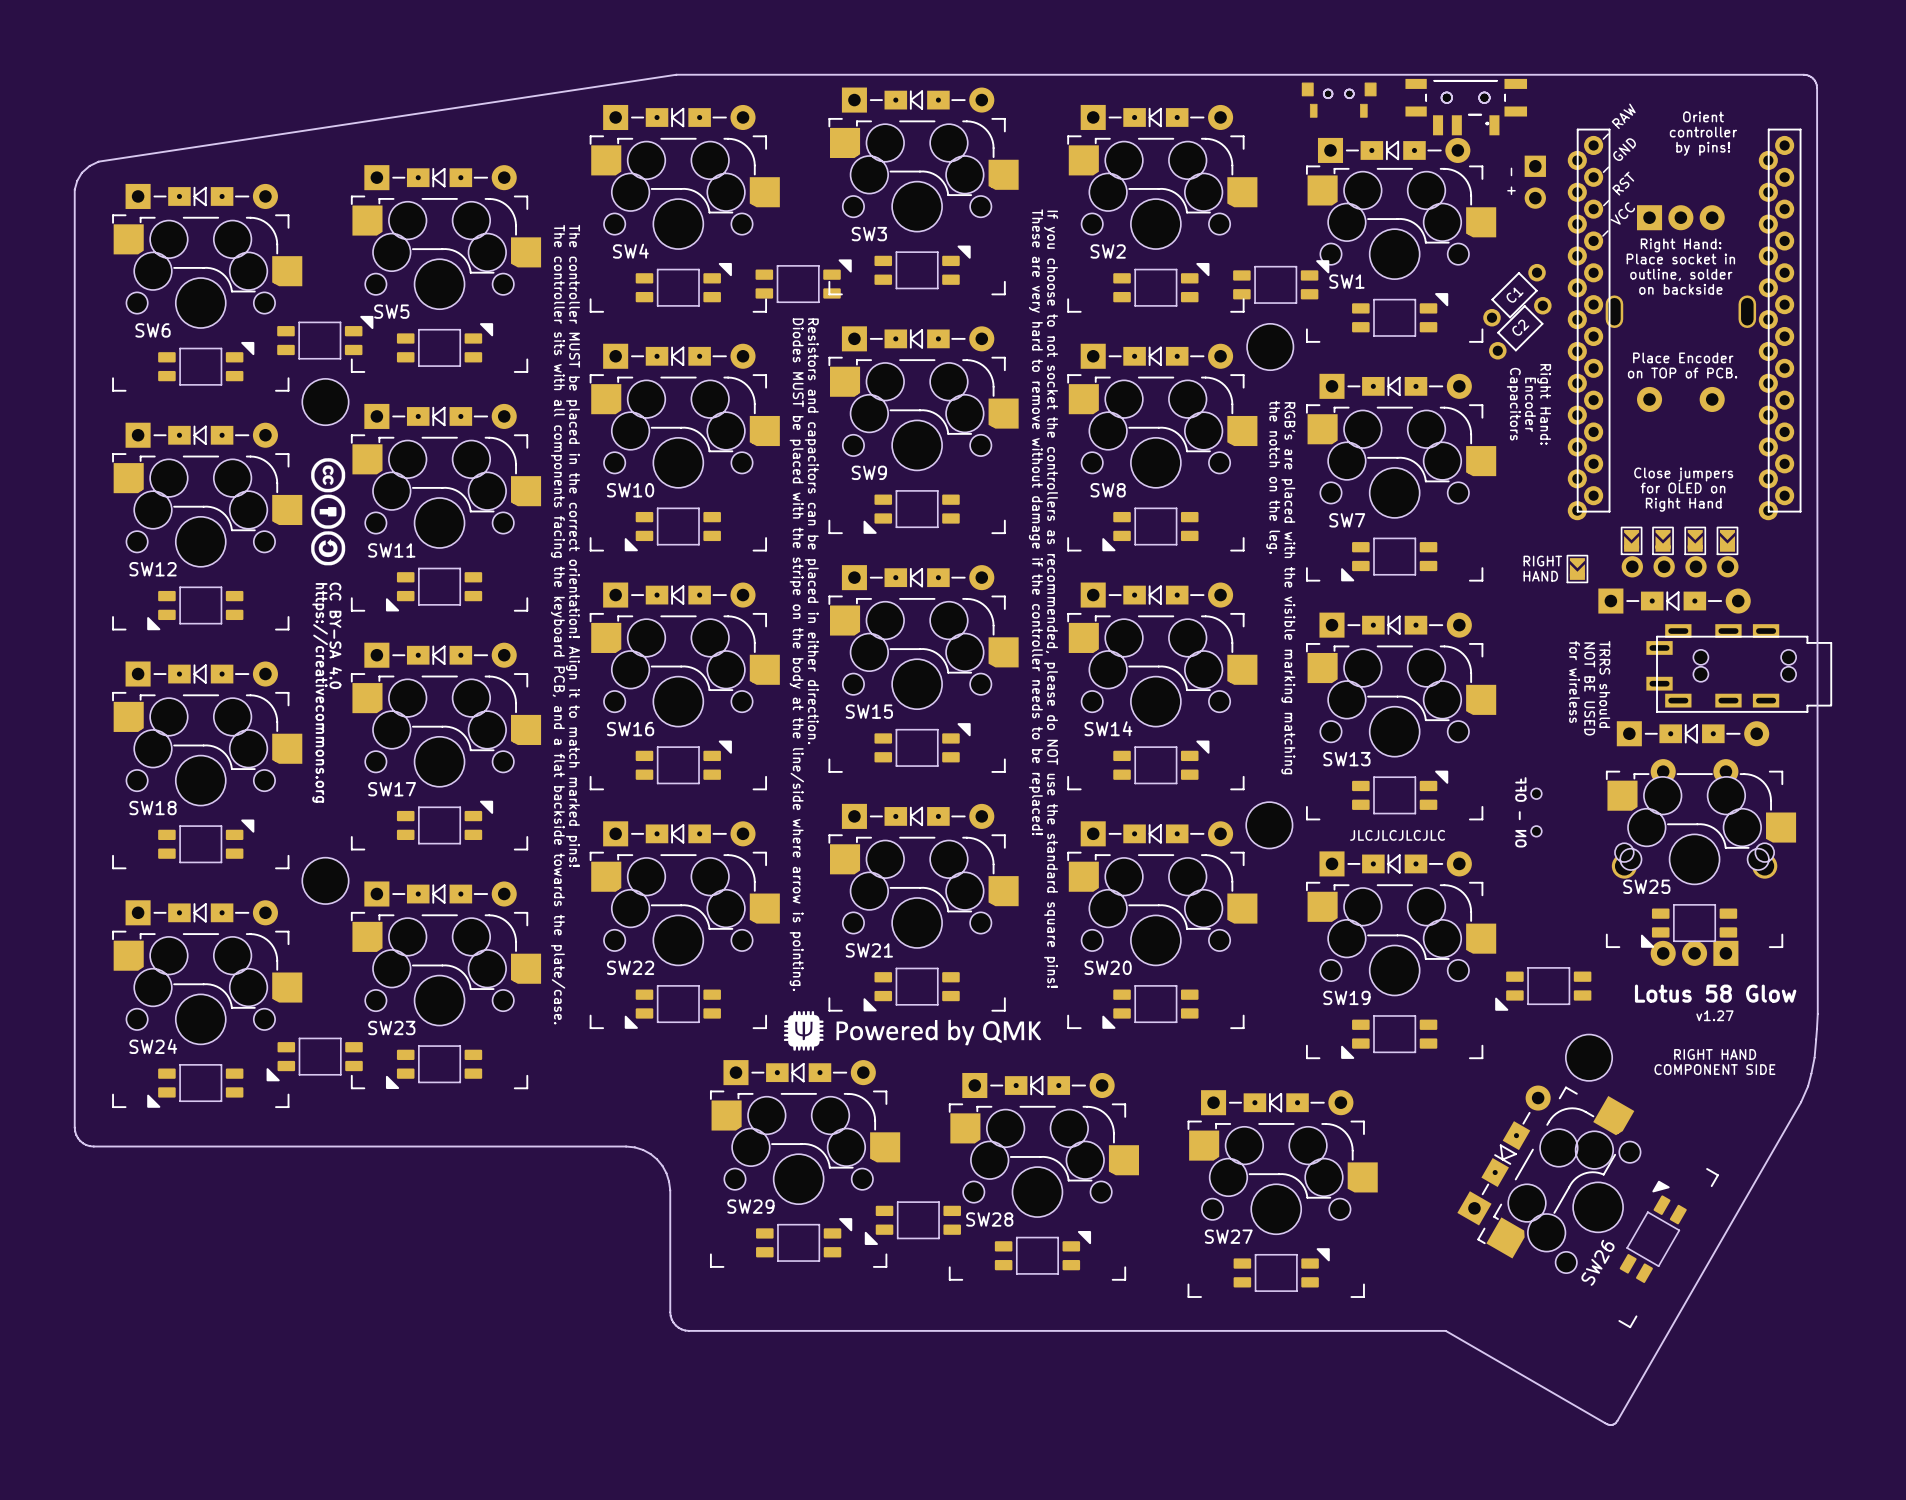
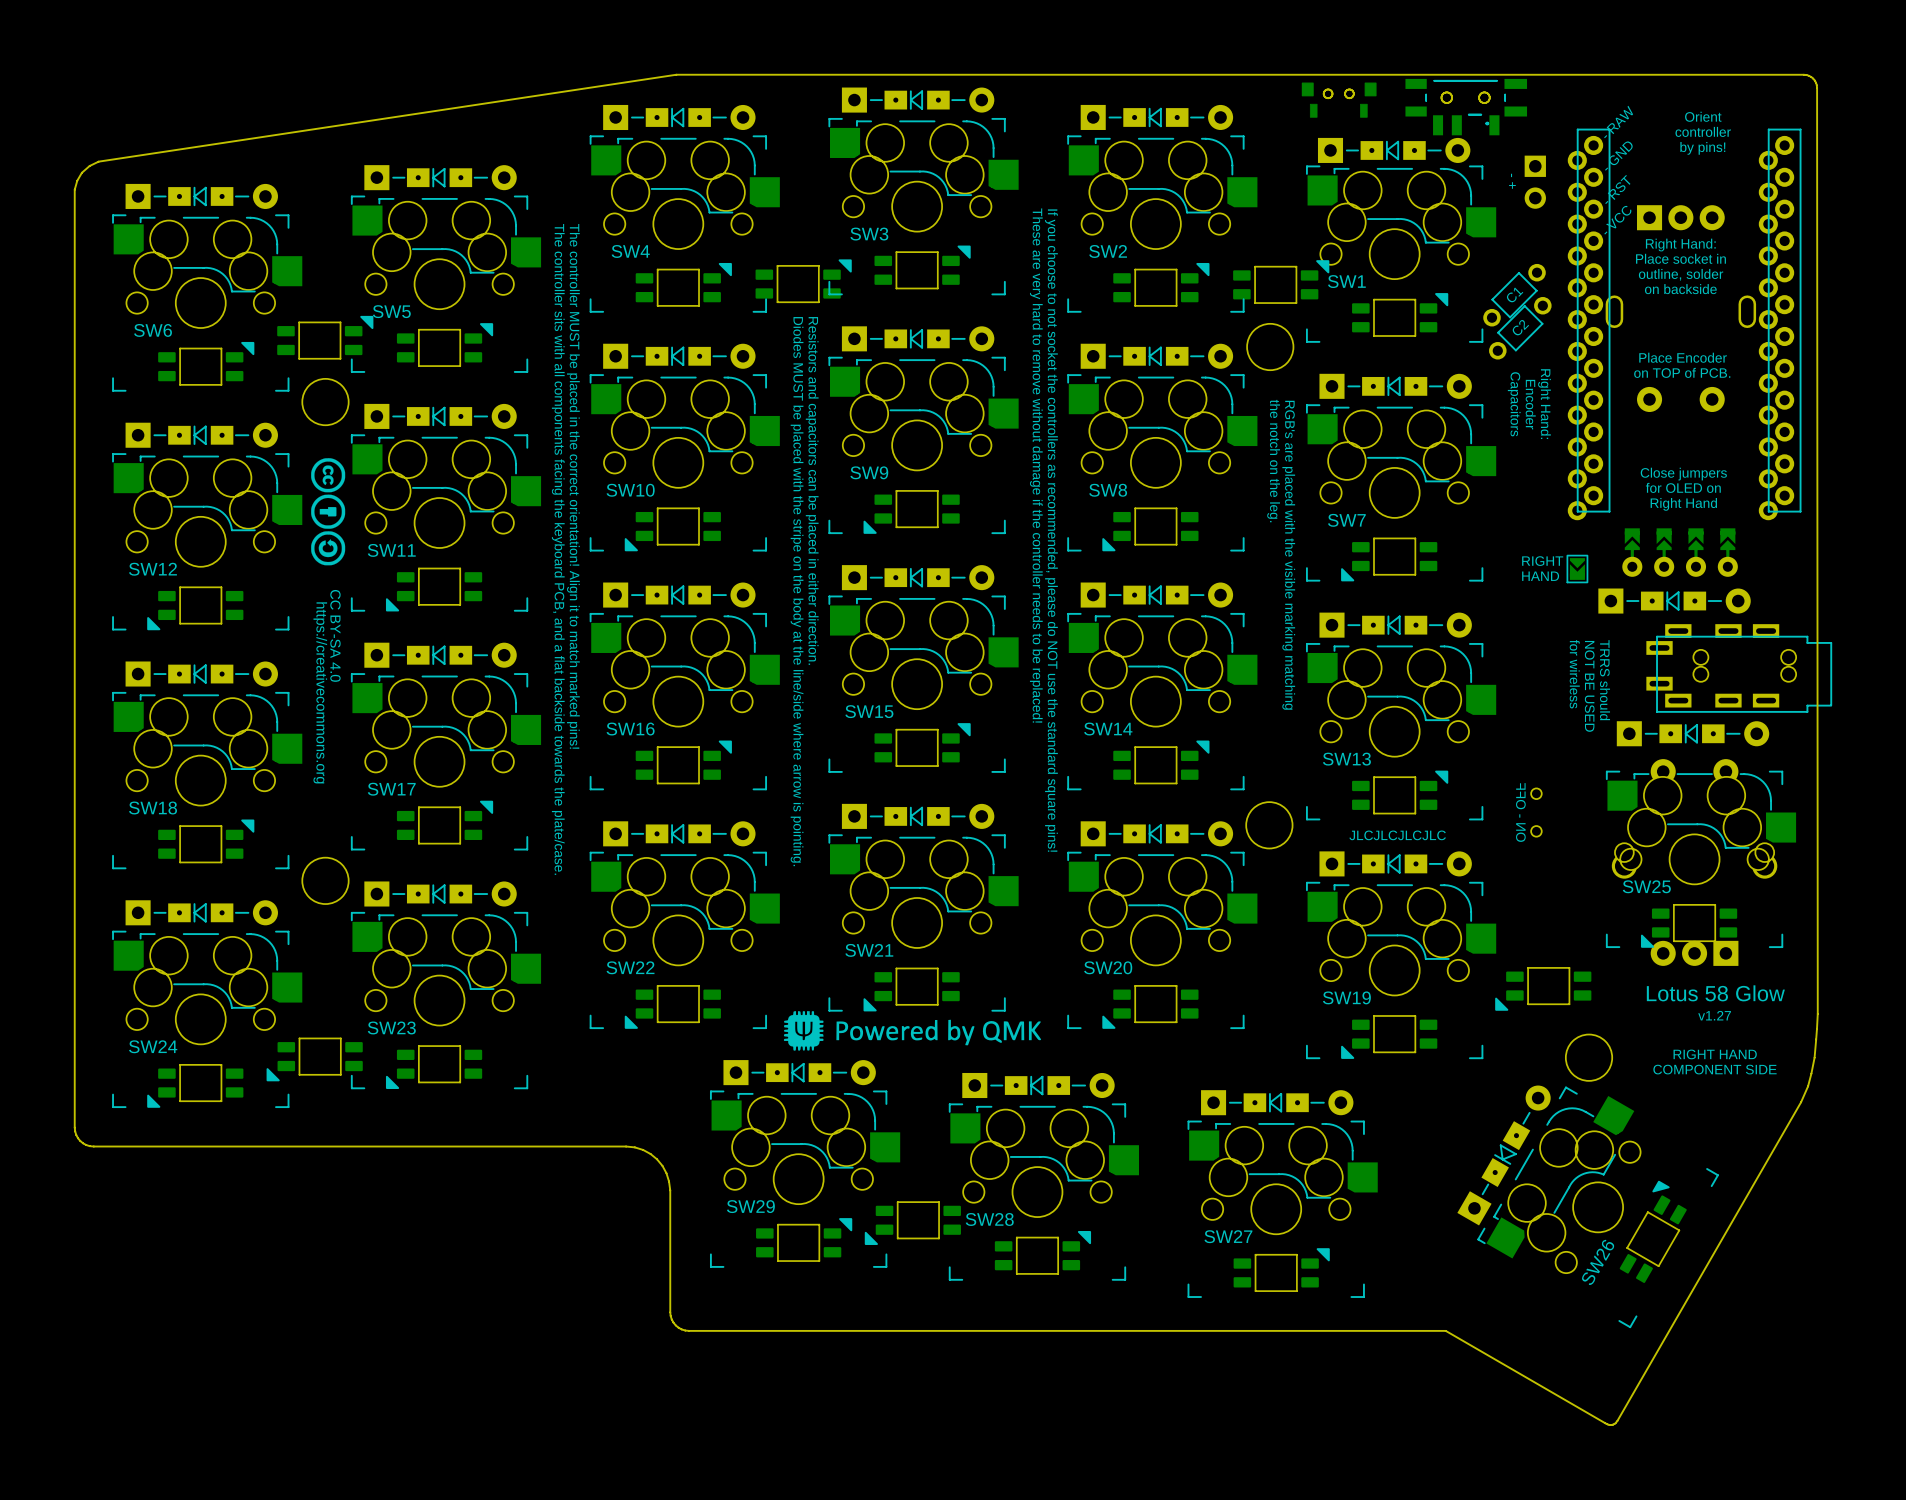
part: (1631, 540) -> none
part: (1663, 540) -> none
part: (1695, 540) -> none
part: (1727, 540) -> none
part: none -> (1680, 552)
part: (1680, 566) -> none

